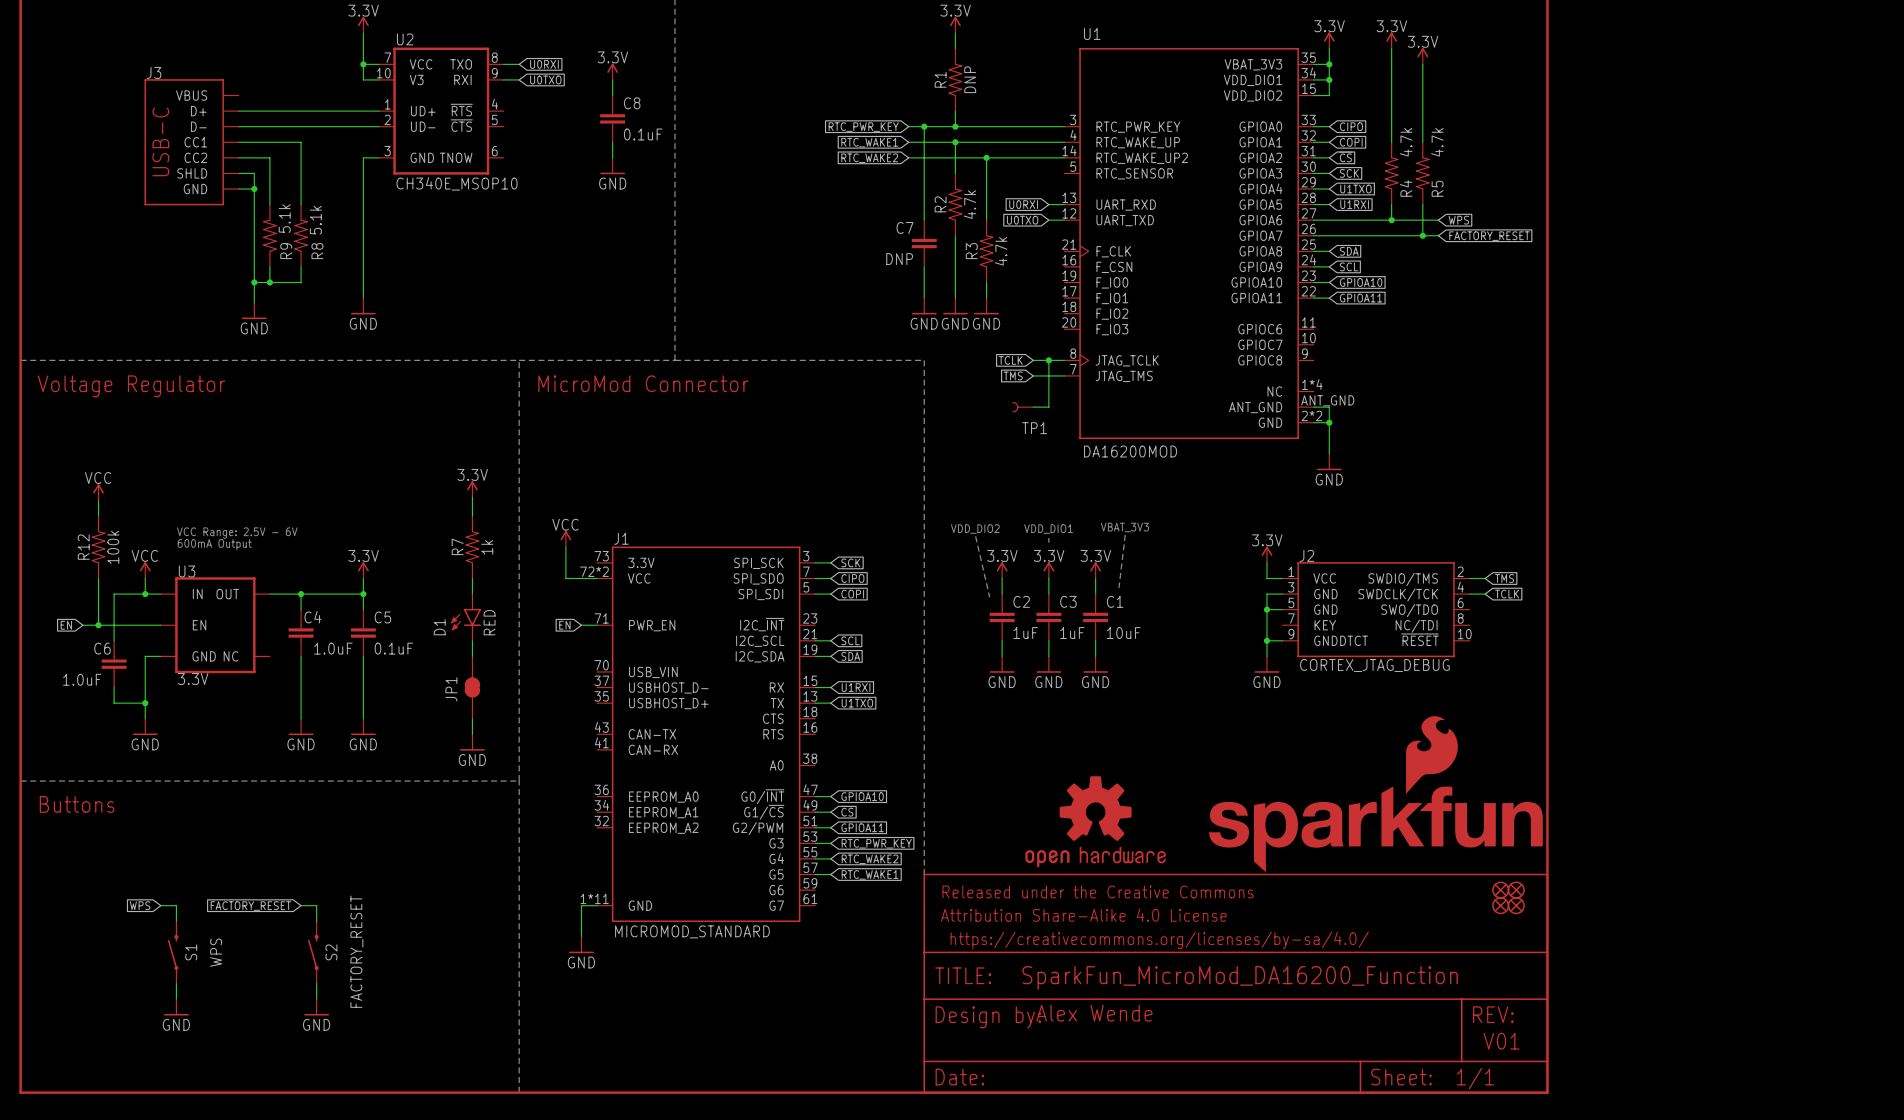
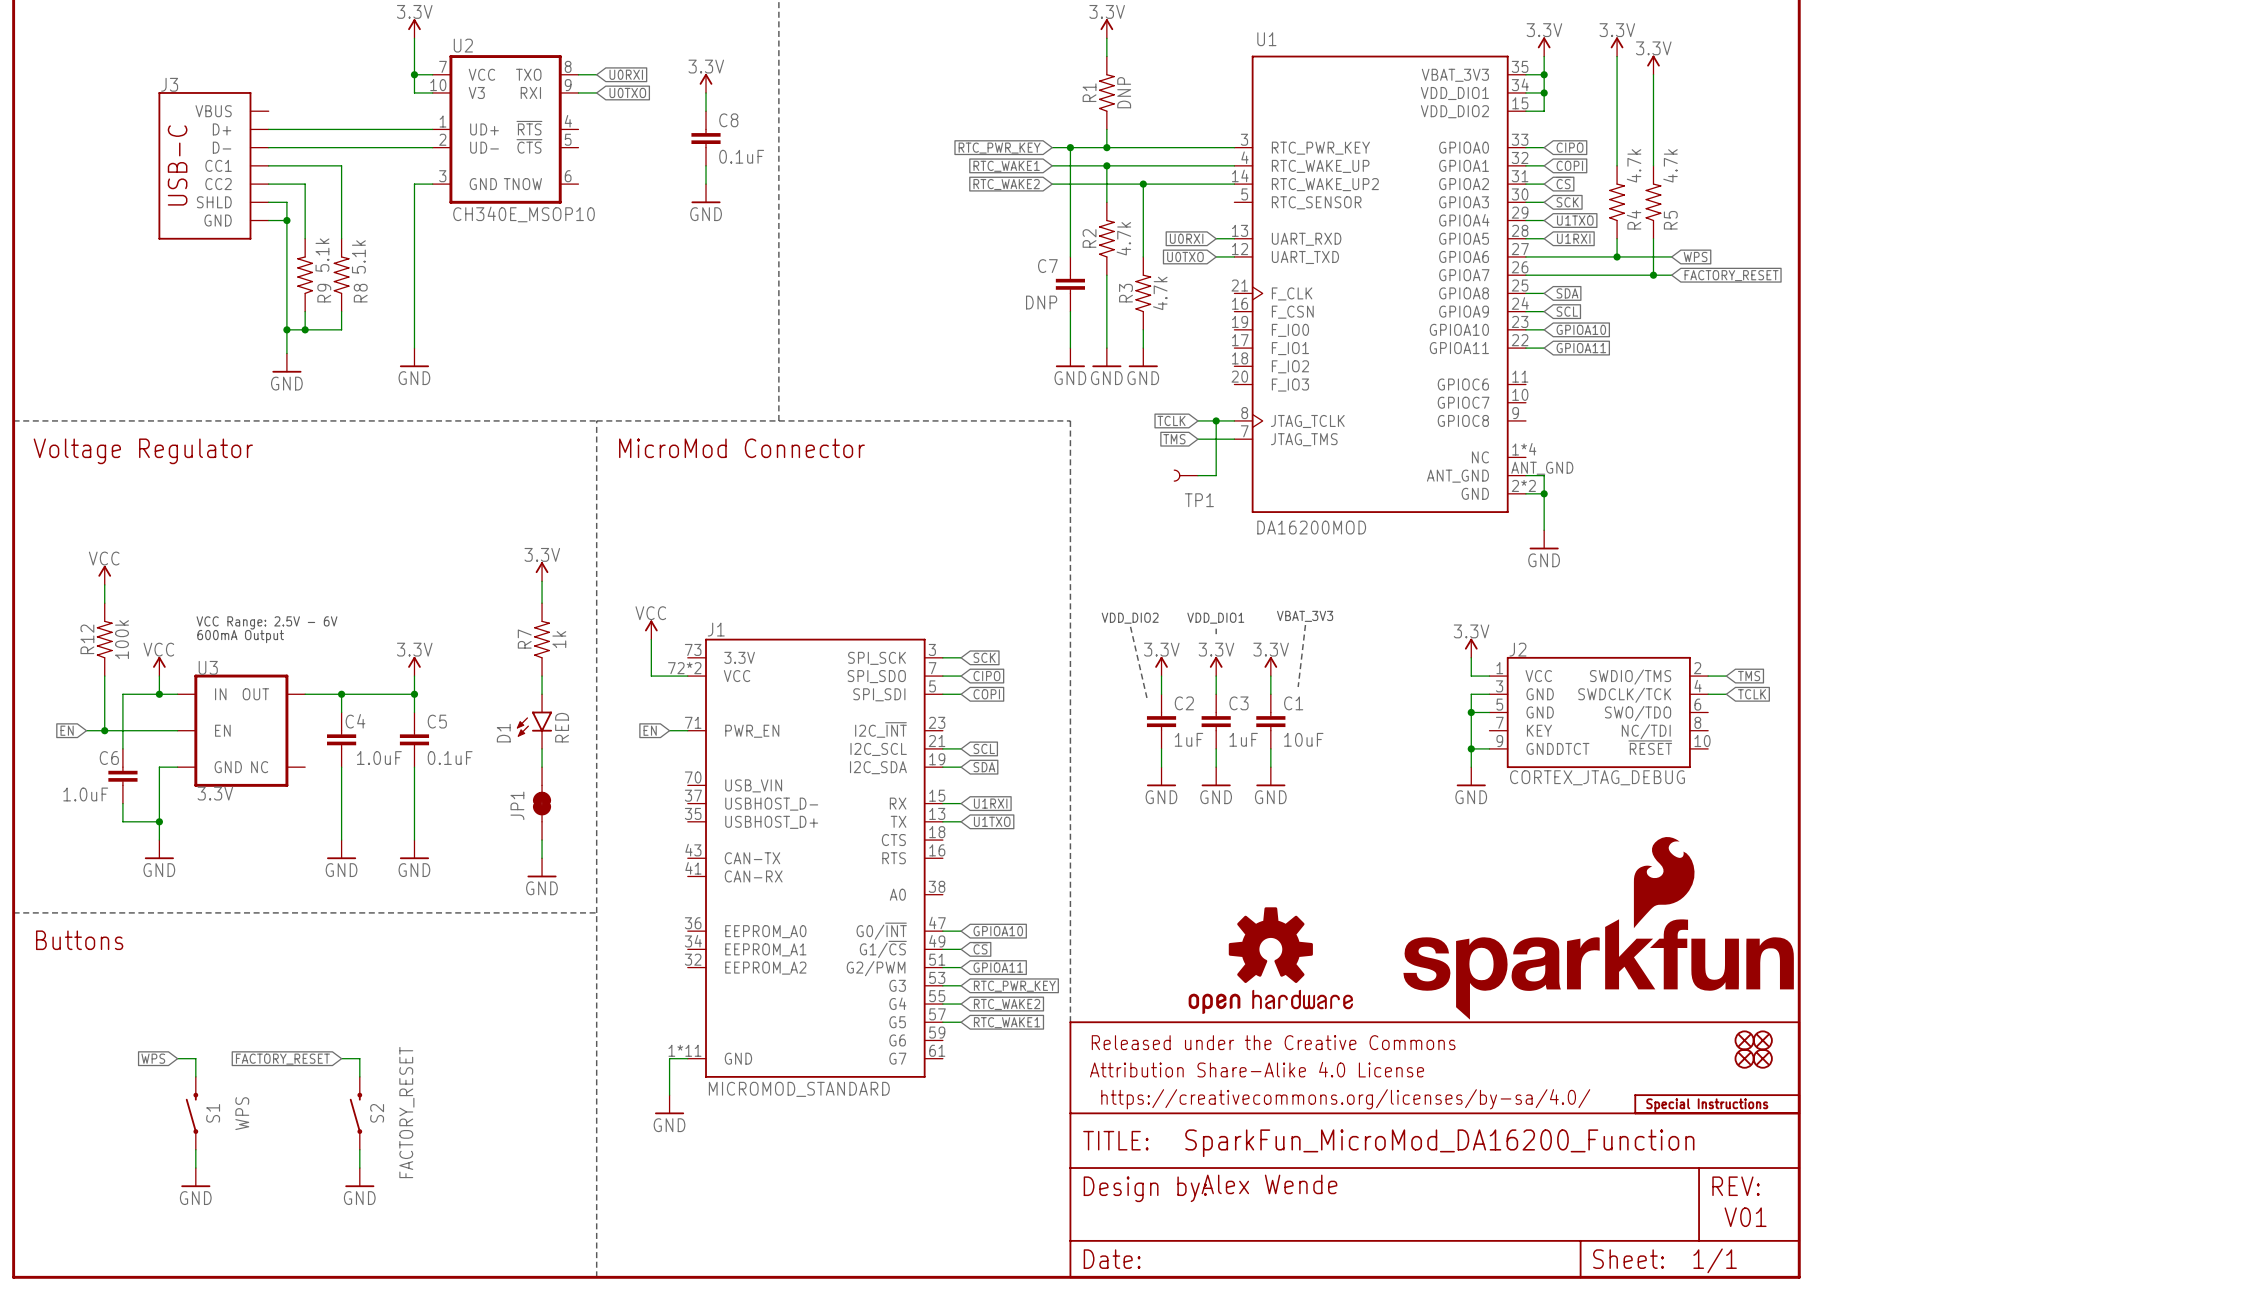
part: none -> (1717, 1104)

